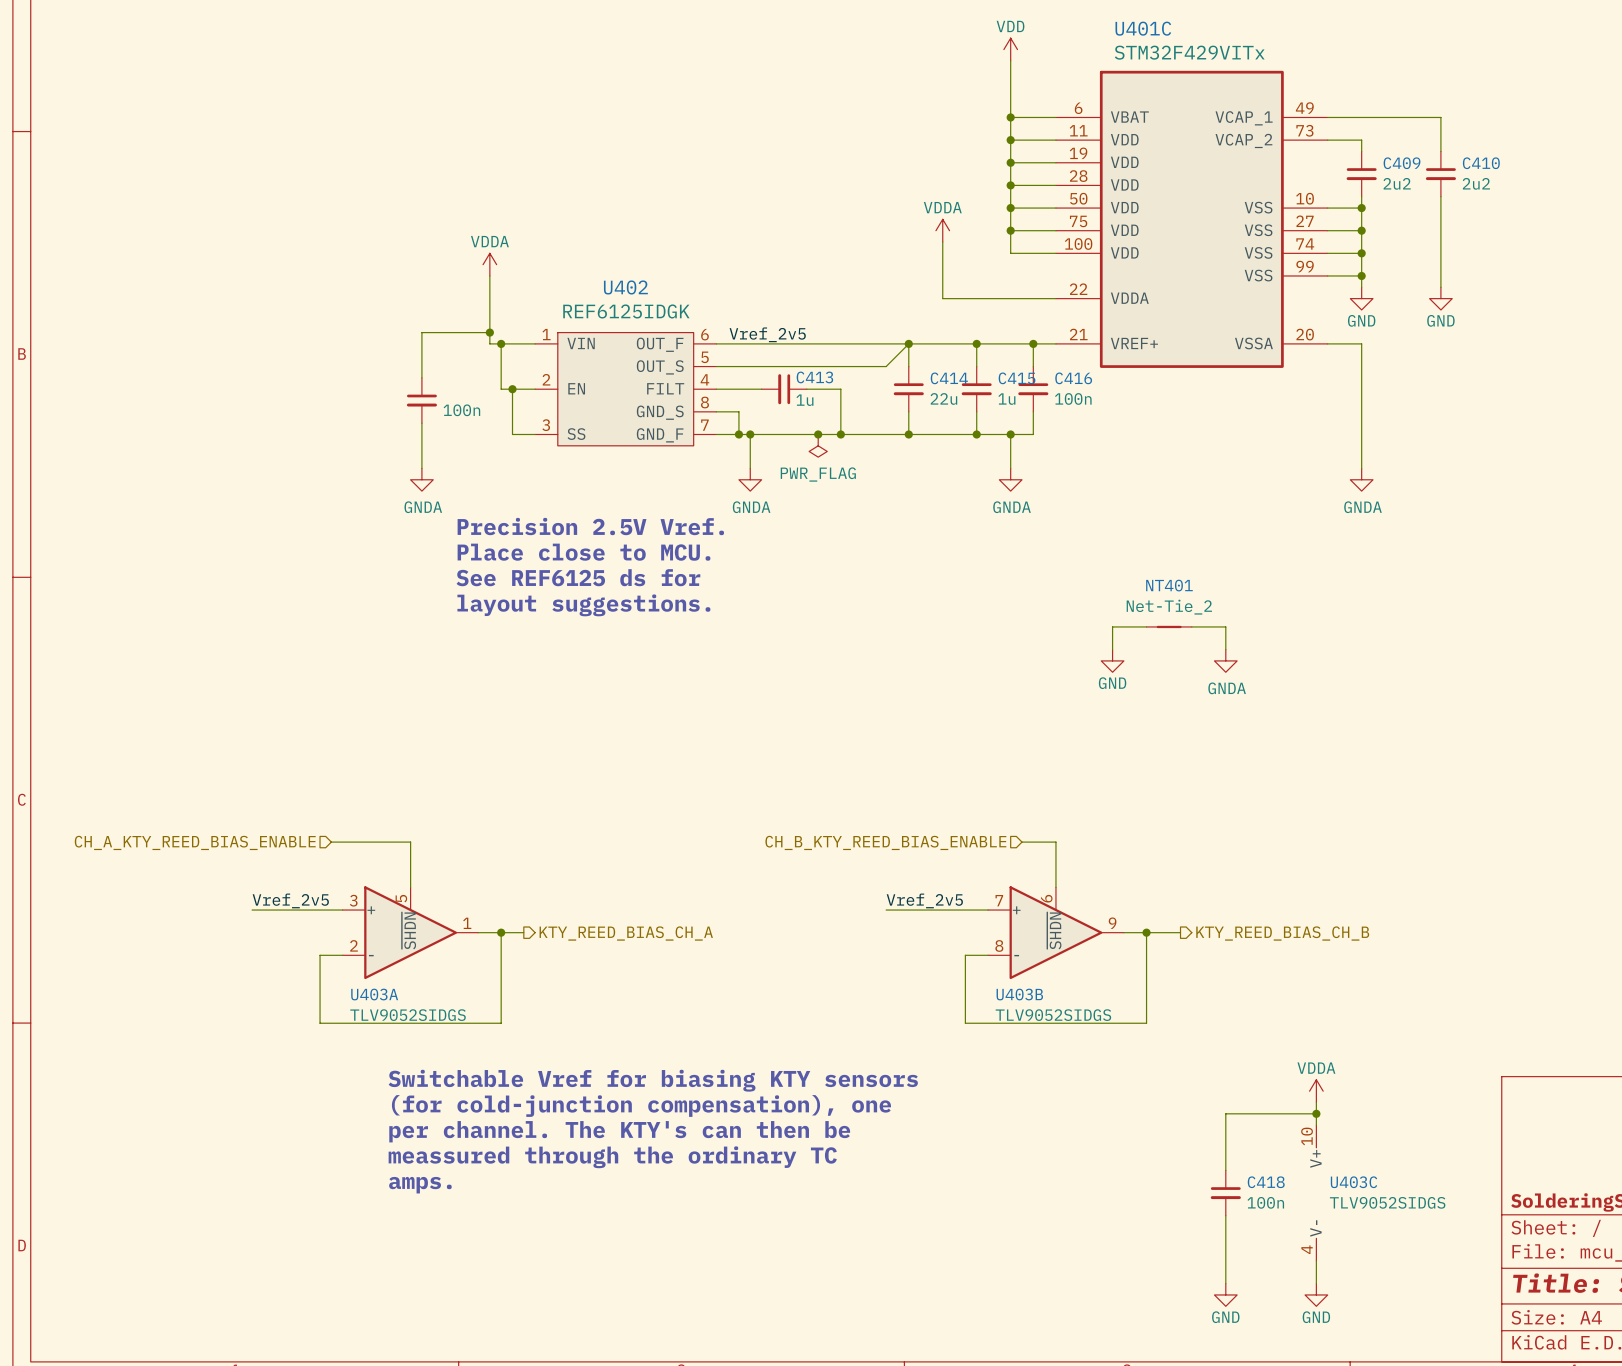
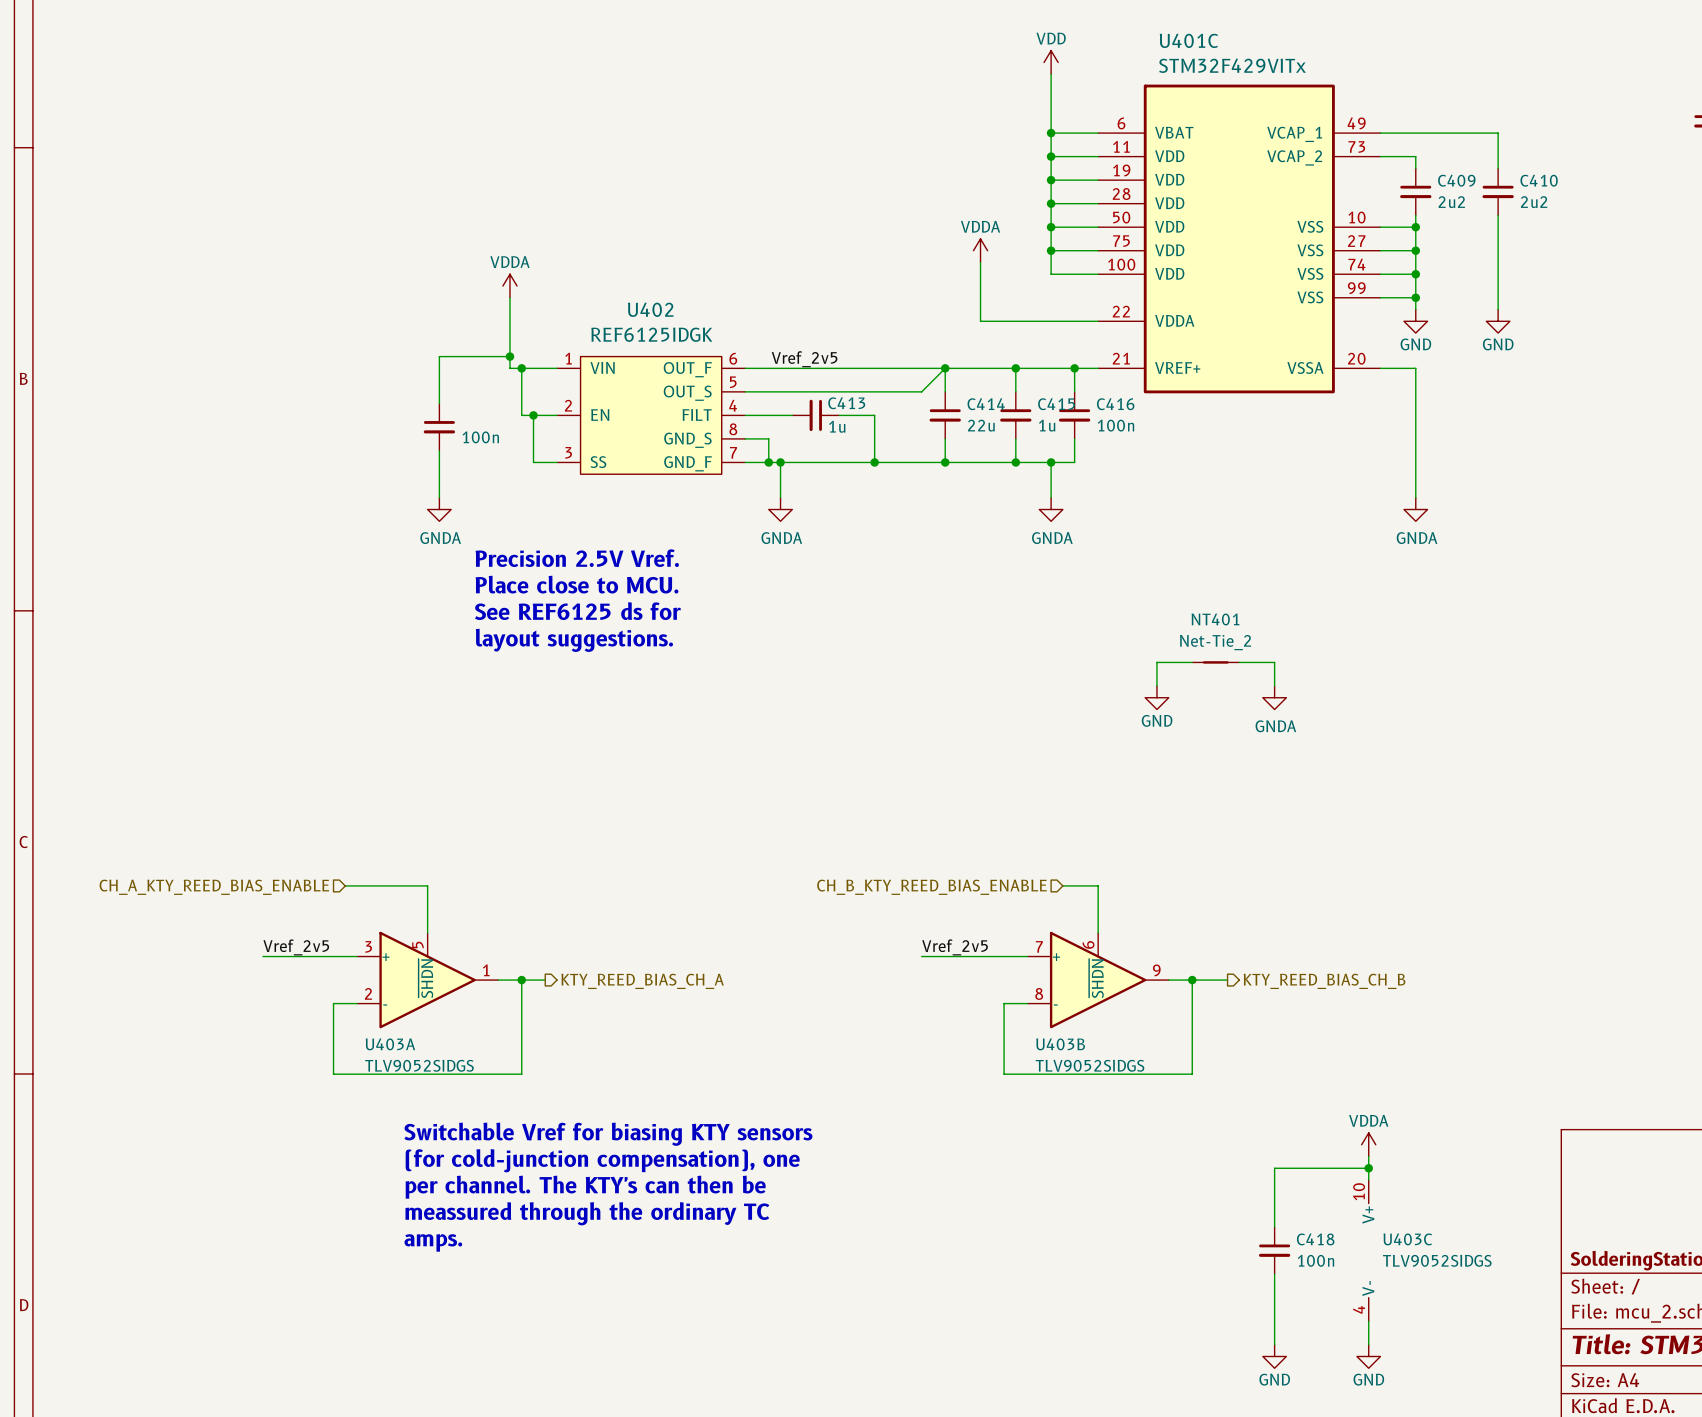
junction: (818, 434) -> none
power symbol: PWR_FLAG (818, 445) -> none

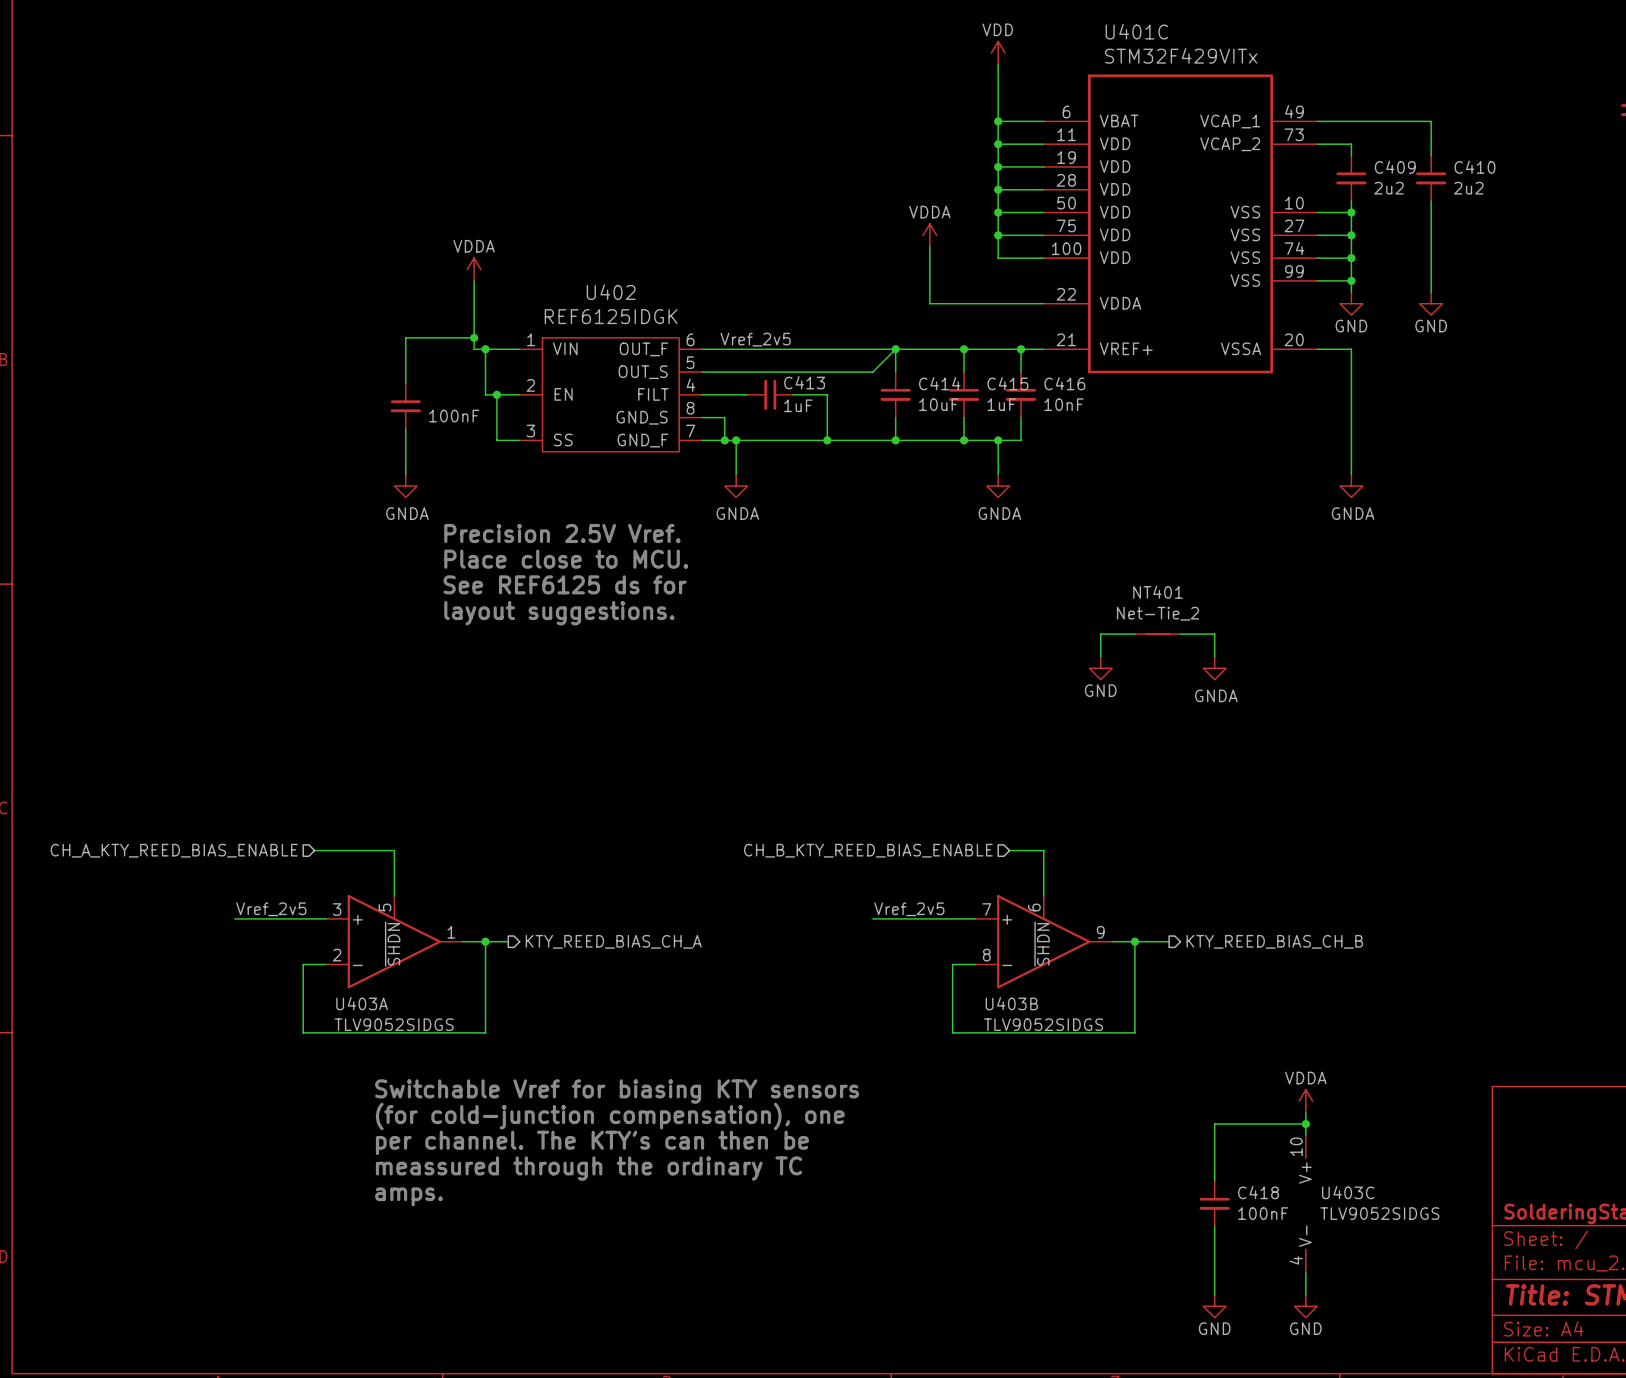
C414 value: 22u (981, 425) -> 10uF (938, 404)
C415 value: 1u (1047, 425) -> 1uF (1001, 404)
C416 value: 100n (1115, 425) -> 10nF (1064, 404)
C413 value: 1u (837, 426) -> 1uF (798, 405)
part value: 100n (480, 437) -> 100nF (454, 416)
C418 value: 100n (1315, 1260) -> 100nF (1263, 1213)

